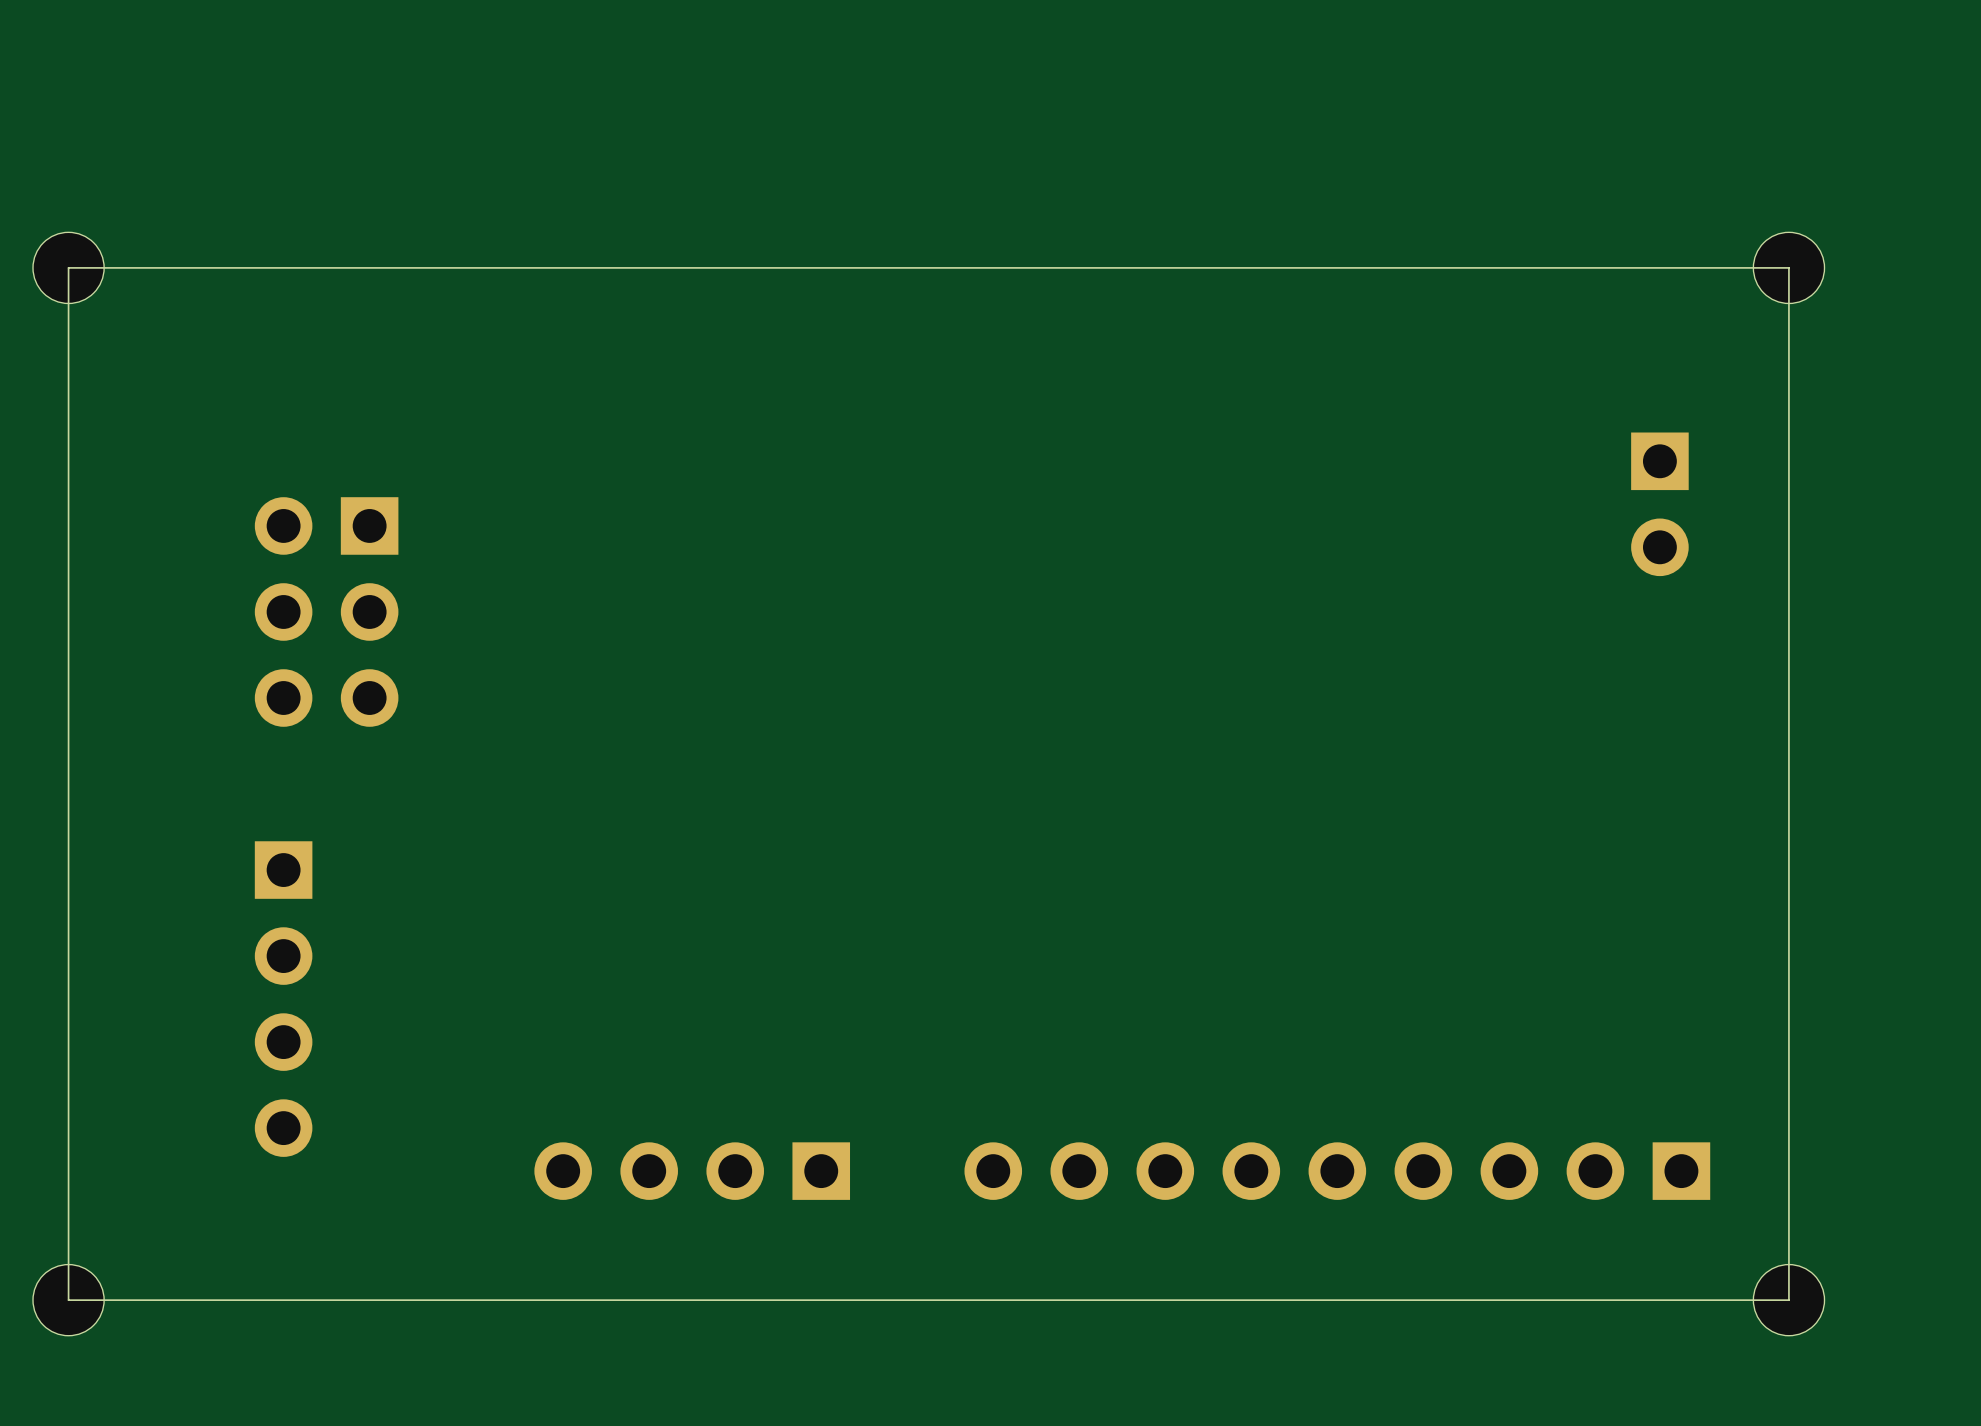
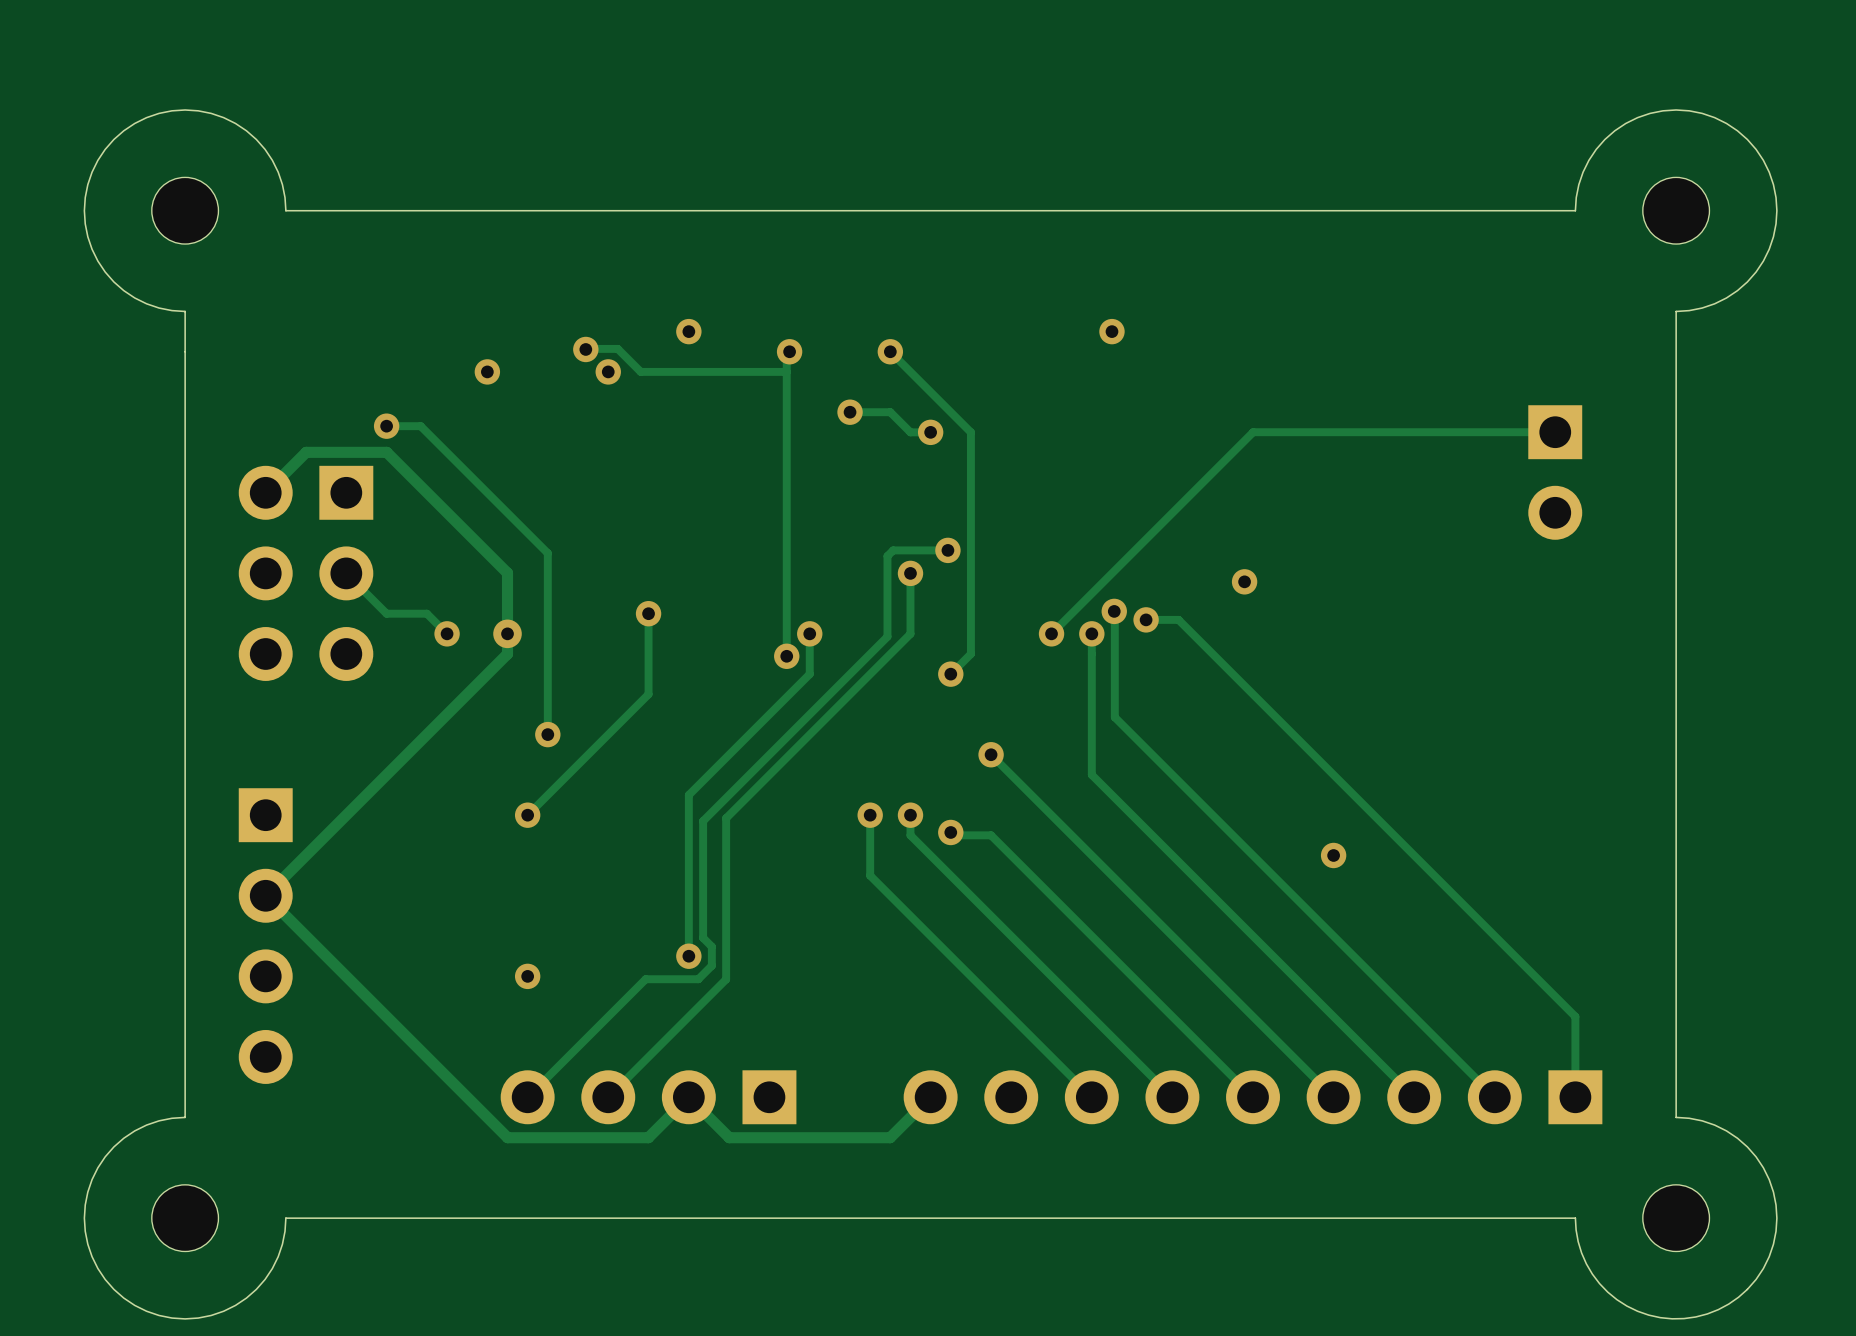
part position: (68, 267) -> (185, 210)
part position: (1788, 267) -> (1676, 210)
board edge: (1788, 332) (1788, 267) (68, 267) (68, 1300) (305, 1300) -> (1676, 311) (1702, 308) (1714, 303) (1737, 290) (1747, 281) (1763, 261) (1769, 249) (1776, 223) (1776, 197) (1773, 184) (1769, 172) (1756, 149) (1737, 130) (1726, 123) (1702, 113) (1689, 110) (1676, 109) (1650, 113) (1625, 123) (1604, 139) (1588, 160) (1583, 172) (1578, 184) (1575, 210) (285, 210) (282, 184) (272, 160) (256, 139) (235, 123) (211, 113) (185, 109) (159, 113) (134, 123) (113, 139) (97, 160) (87, 184) (84, 210) (87, 236) (92, 249) (97, 261) (113, 281) (134, 297) (146, 303) (171, 310) (185, 311) (185, 1117) (159, 1120) (134, 1130) (123, 1138) (105, 1156) (97, 1167) (87, 1192) (84, 1218) (85, 1231) (92, 1256) (97, 1268) (105, 1279) (123, 1298) (146, 1311) (171, 1318) (185, 1318) (211, 1315) (223, 1311) (235, 1305) (256, 1289) (265, 1279) (278, 1256) (282, 1244) (285, 1218)
via: none -> (688, 331)
via: none -> (1111, 331)
track: none -> (585, 349) (588, 351) (590, 348) (617, 348) (640, 371) (786, 371)
via: none -> (585, 349)
track: none -> (789, 351) (786, 354) (786, 656)
via: none -> (789, 351)
track: none -> (890, 351) (970, 432) (970, 653) (950, 674)
via: none -> (890, 351)
via: none -> (487, 371)
via: none -> (608, 371)
track: none -> (850, 412) (890, 412) (910, 432) (930, 432)
via: none -> (850, 412)
track: none -> (386, 426) (420, 426) (547, 553) (547, 734)
via: none -> (386, 426)
via: none -> (930, 432)
track: none -> (1555, 432) (1253, 432) (1051, 633)
track: none -> (265, 492) (306, 452) (386, 452) (507, 573) (507, 653) (265, 895) (507, 1137) (648, 1137) (688, 1097) (729, 1137) (890, 1137) (930, 1097)
via: none -> (947, 550)
track: none -> (950, 553) (947, 550) (893, 550) (887, 556) (887, 636) (703, 821) (703, 937) (711, 946) (711, 965) (698, 979) (645, 979) (527, 1097)
track: none -> (346, 573) (386, 613) (426, 613) (447, 633)
track: none -> (910, 573) (910, 633) (726, 818) (726, 979) (608, 1097)
via: none -> (910, 573)
via: none -> (1244, 581)
track: none -> (1114, 611) (1114, 717) (1494, 1097)
via: none -> (1114, 611)
track: none -> (648, 613) (648, 694) (527, 815)
via: none -> (648, 613)
track: none -> (1146, 619) (1178, 619) (1575, 1016) (1575, 1097)
via: none -> (1146, 619)
via: none -> (447, 633)
via: none -> (507, 633)
track: none -> (809, 633) (809, 674) (688, 795) (688, 956)
via: none -> (809, 633)
via: none -> (1051, 633)
track: none -> (1091, 633) (1091, 774) (1414, 1097)
via: none -> (1091, 633)
via: none -> (786, 656)
via: none -> (950, 674)
via: none -> (547, 734)
track: none -> (991, 754) (1333, 1097)
via: none -> (991, 754)
via: none -> (527, 815)
track: none -> (870, 815) (870, 875) (1091, 1097)
via: none -> (870, 815)
track: none -> (910, 815) (910, 835) (1172, 1097)
via: none -> (910, 815)
track: none -> (950, 832) (950, 835) (991, 835) (1253, 1097)
via: none -> (950, 832)
via: none -> (1333, 855)
via: none -> (688, 956)
via: none -> (527, 976)
board edge: (1788, 1192) (1788, 1300) (1681, 1300) -> (1676, 1117) (1702, 1120) (1714, 1125) (1737, 1138) (1756, 1156) (1769, 1179) (1776, 1205) (1776, 1231) (1773, 1244) (1763, 1268) (1747, 1289) (1718, 1309) (1695, 1316) (1672, 1318) (1637, 1311) (1616, 1299) (1592, 1274) (1578, 1241) (1575, 1218)
part position: (68, 1300) -> (185, 1218)

